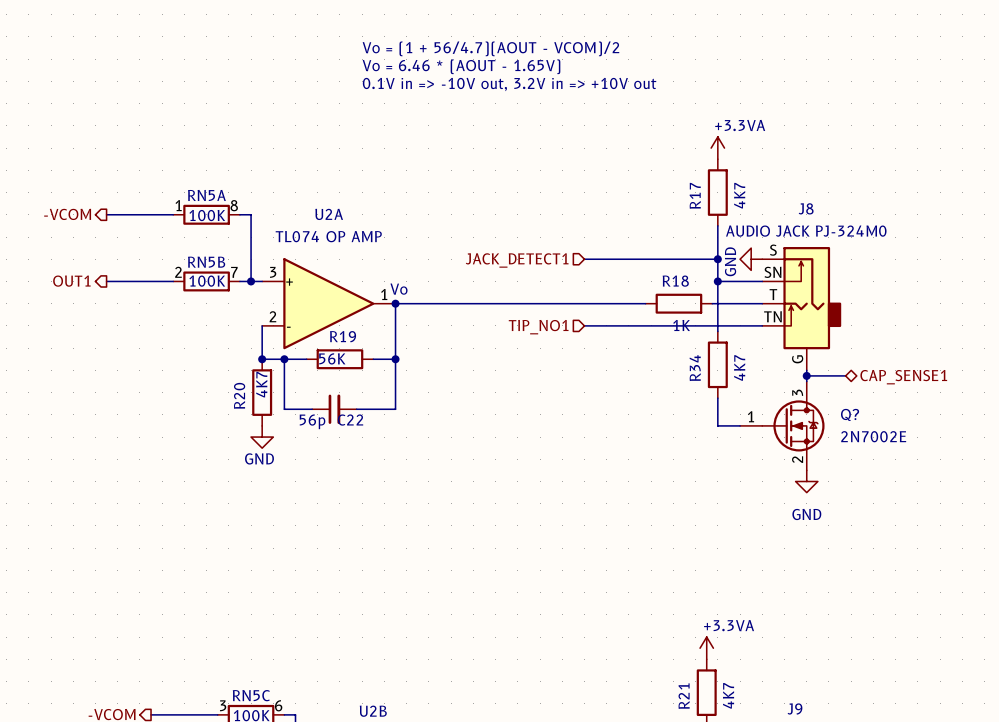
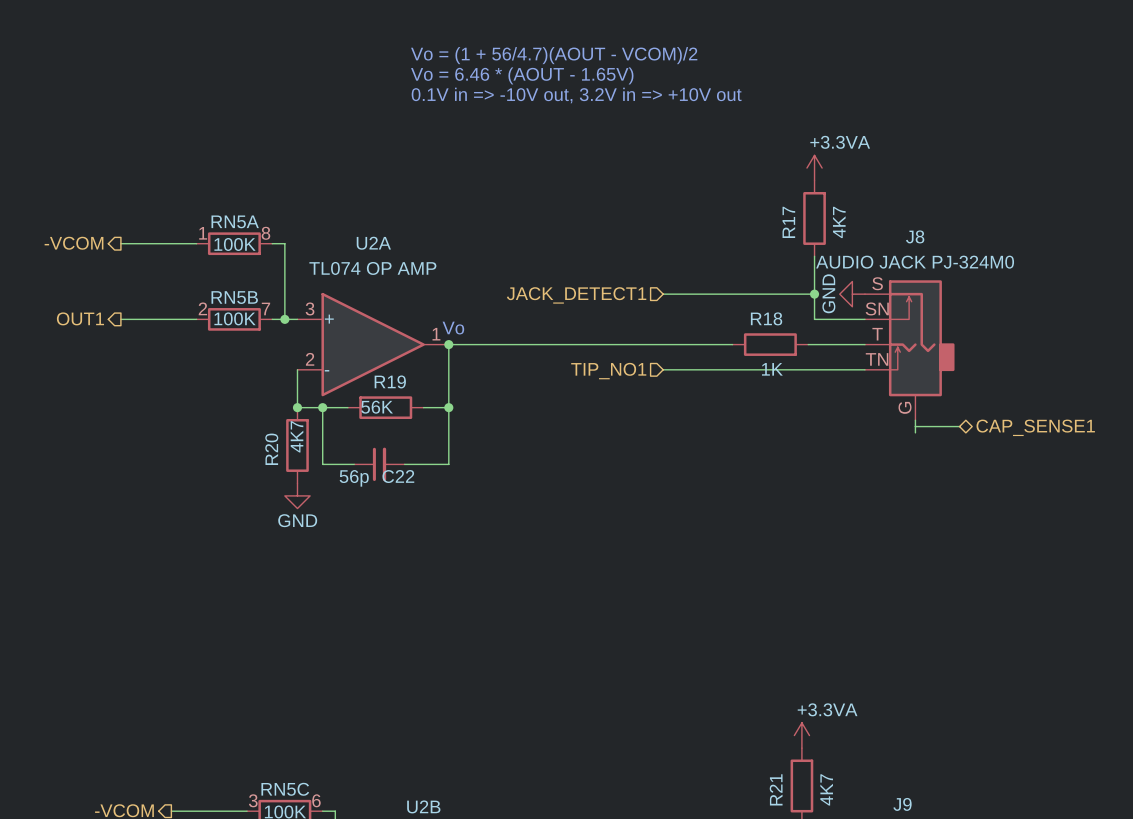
wire: (717, 281) (717, 331) -> none
junction: (717, 281) -> none
R34: 4K7 (717, 364) -> none
junction: (806, 375) -> none
wire: (717, 398) (717, 425) (740, 425) -> none
Q?: 2N7002E (782, 425) -> none
power symbol: GND (806, 481) -> none

